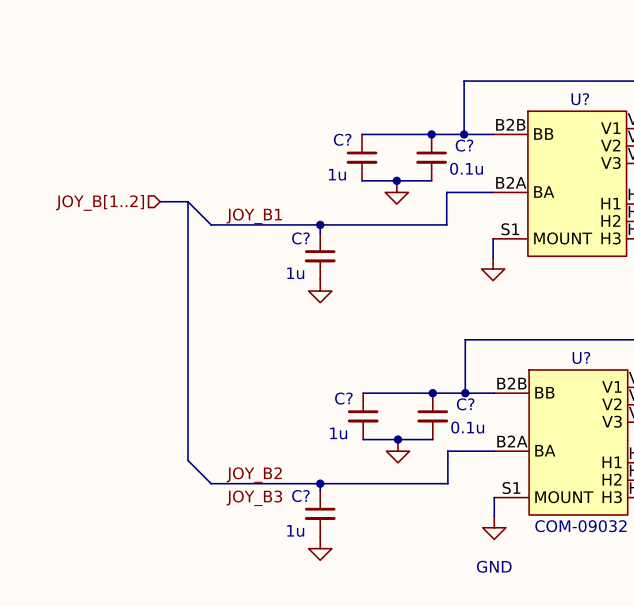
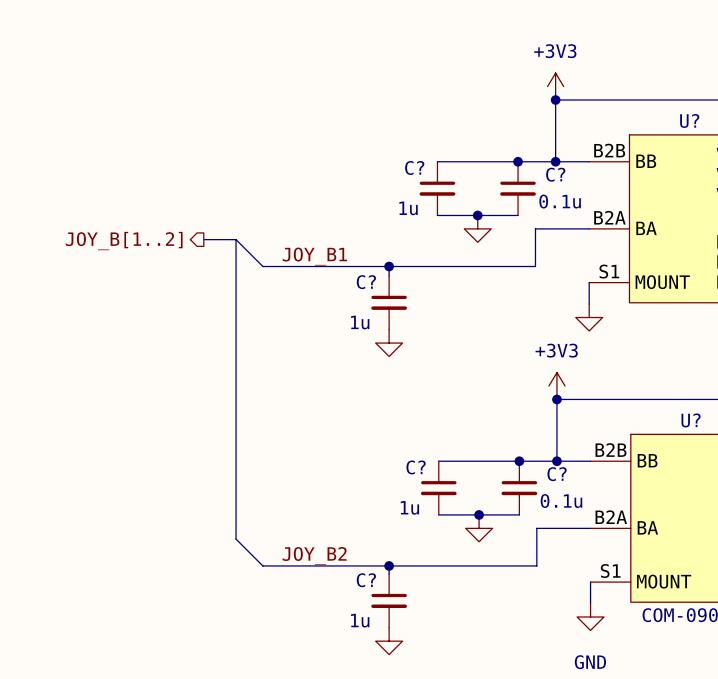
power symbol: none -> +3V3 (555, 86)
junction: none -> (555, 99)
hierarchical label shape: input (100, 202) -> output (124, 241)
power symbol: none -> +3V3 (556, 386)
junction: none -> (556, 399)
label: JOY_B3 (254, 498) -> none

